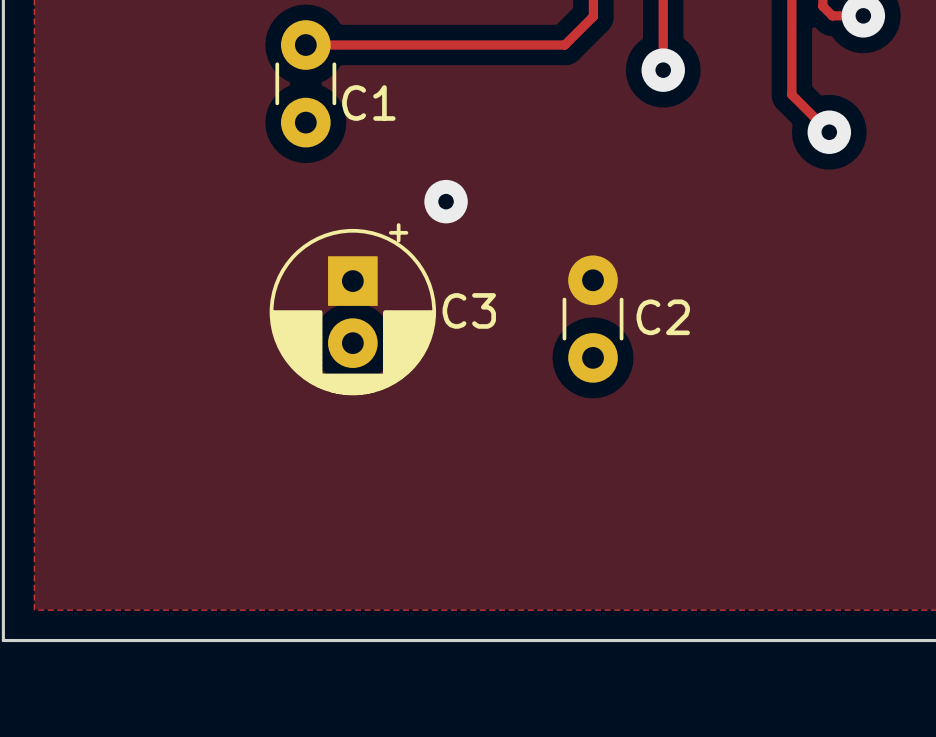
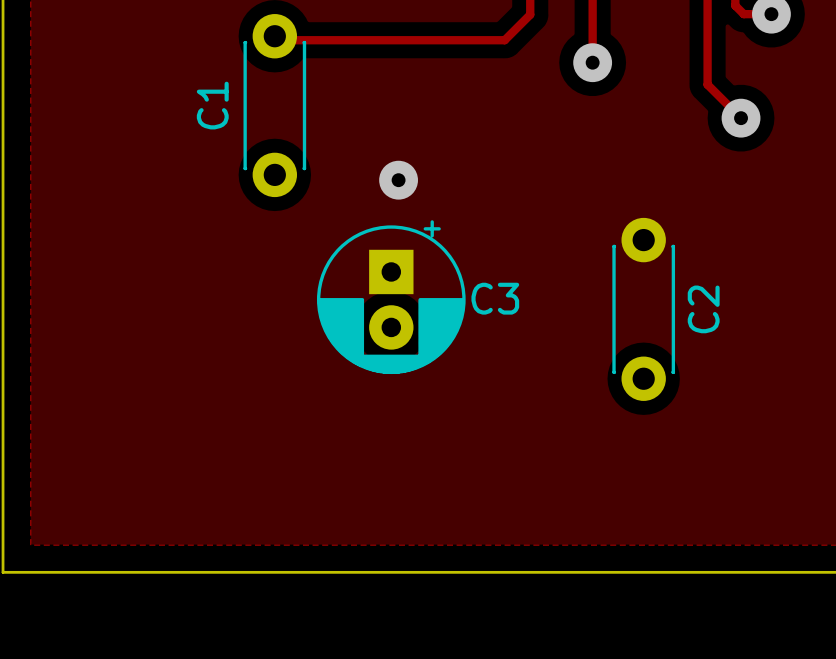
C1 footprint: [275, 20, 337, 148] -> [243, 14, 307, 198]
C1 name position: C1 (368, 102) -> C1 (212, 105)
C2 footprint: [562, 255, 624, 383] -> [612, 217, 676, 401]
C3 position: (352, 309) -> (391, 297)

